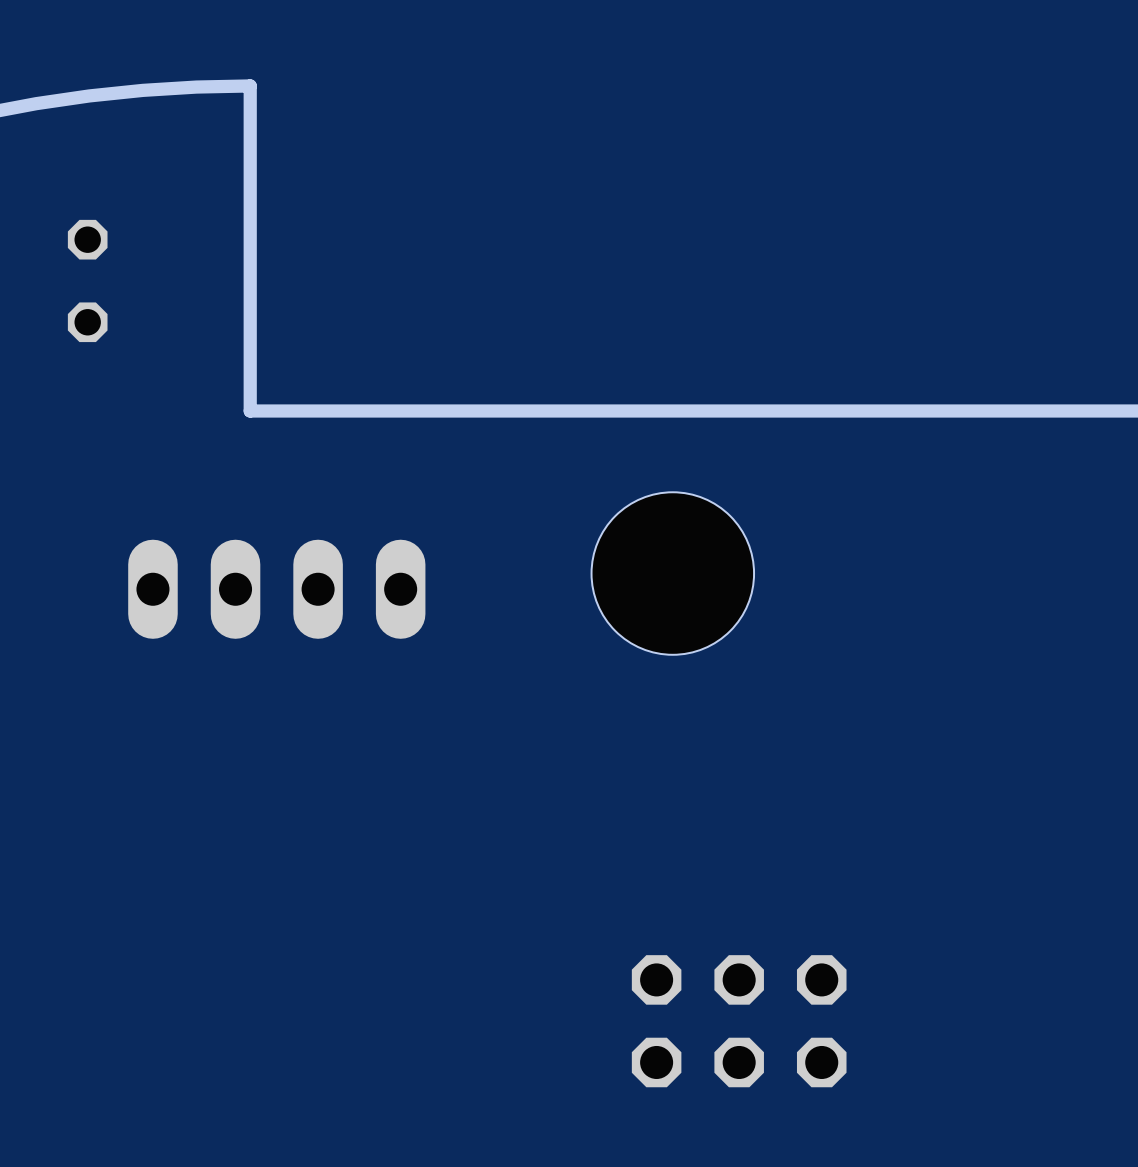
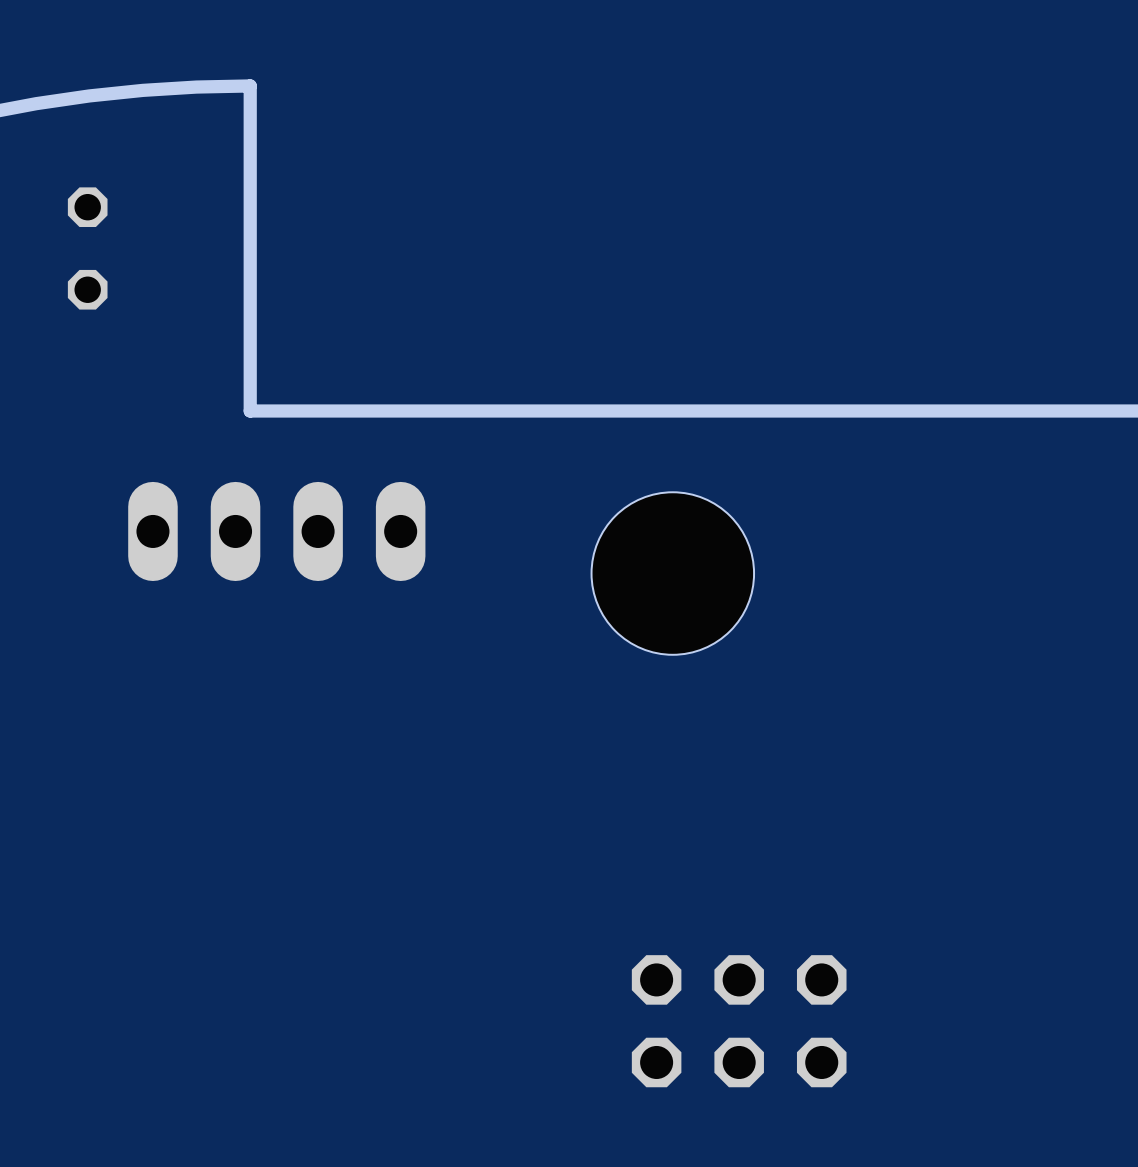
part position: (87, 280) -> (87, 248)
part position: (276, 589) -> (276, 531)

